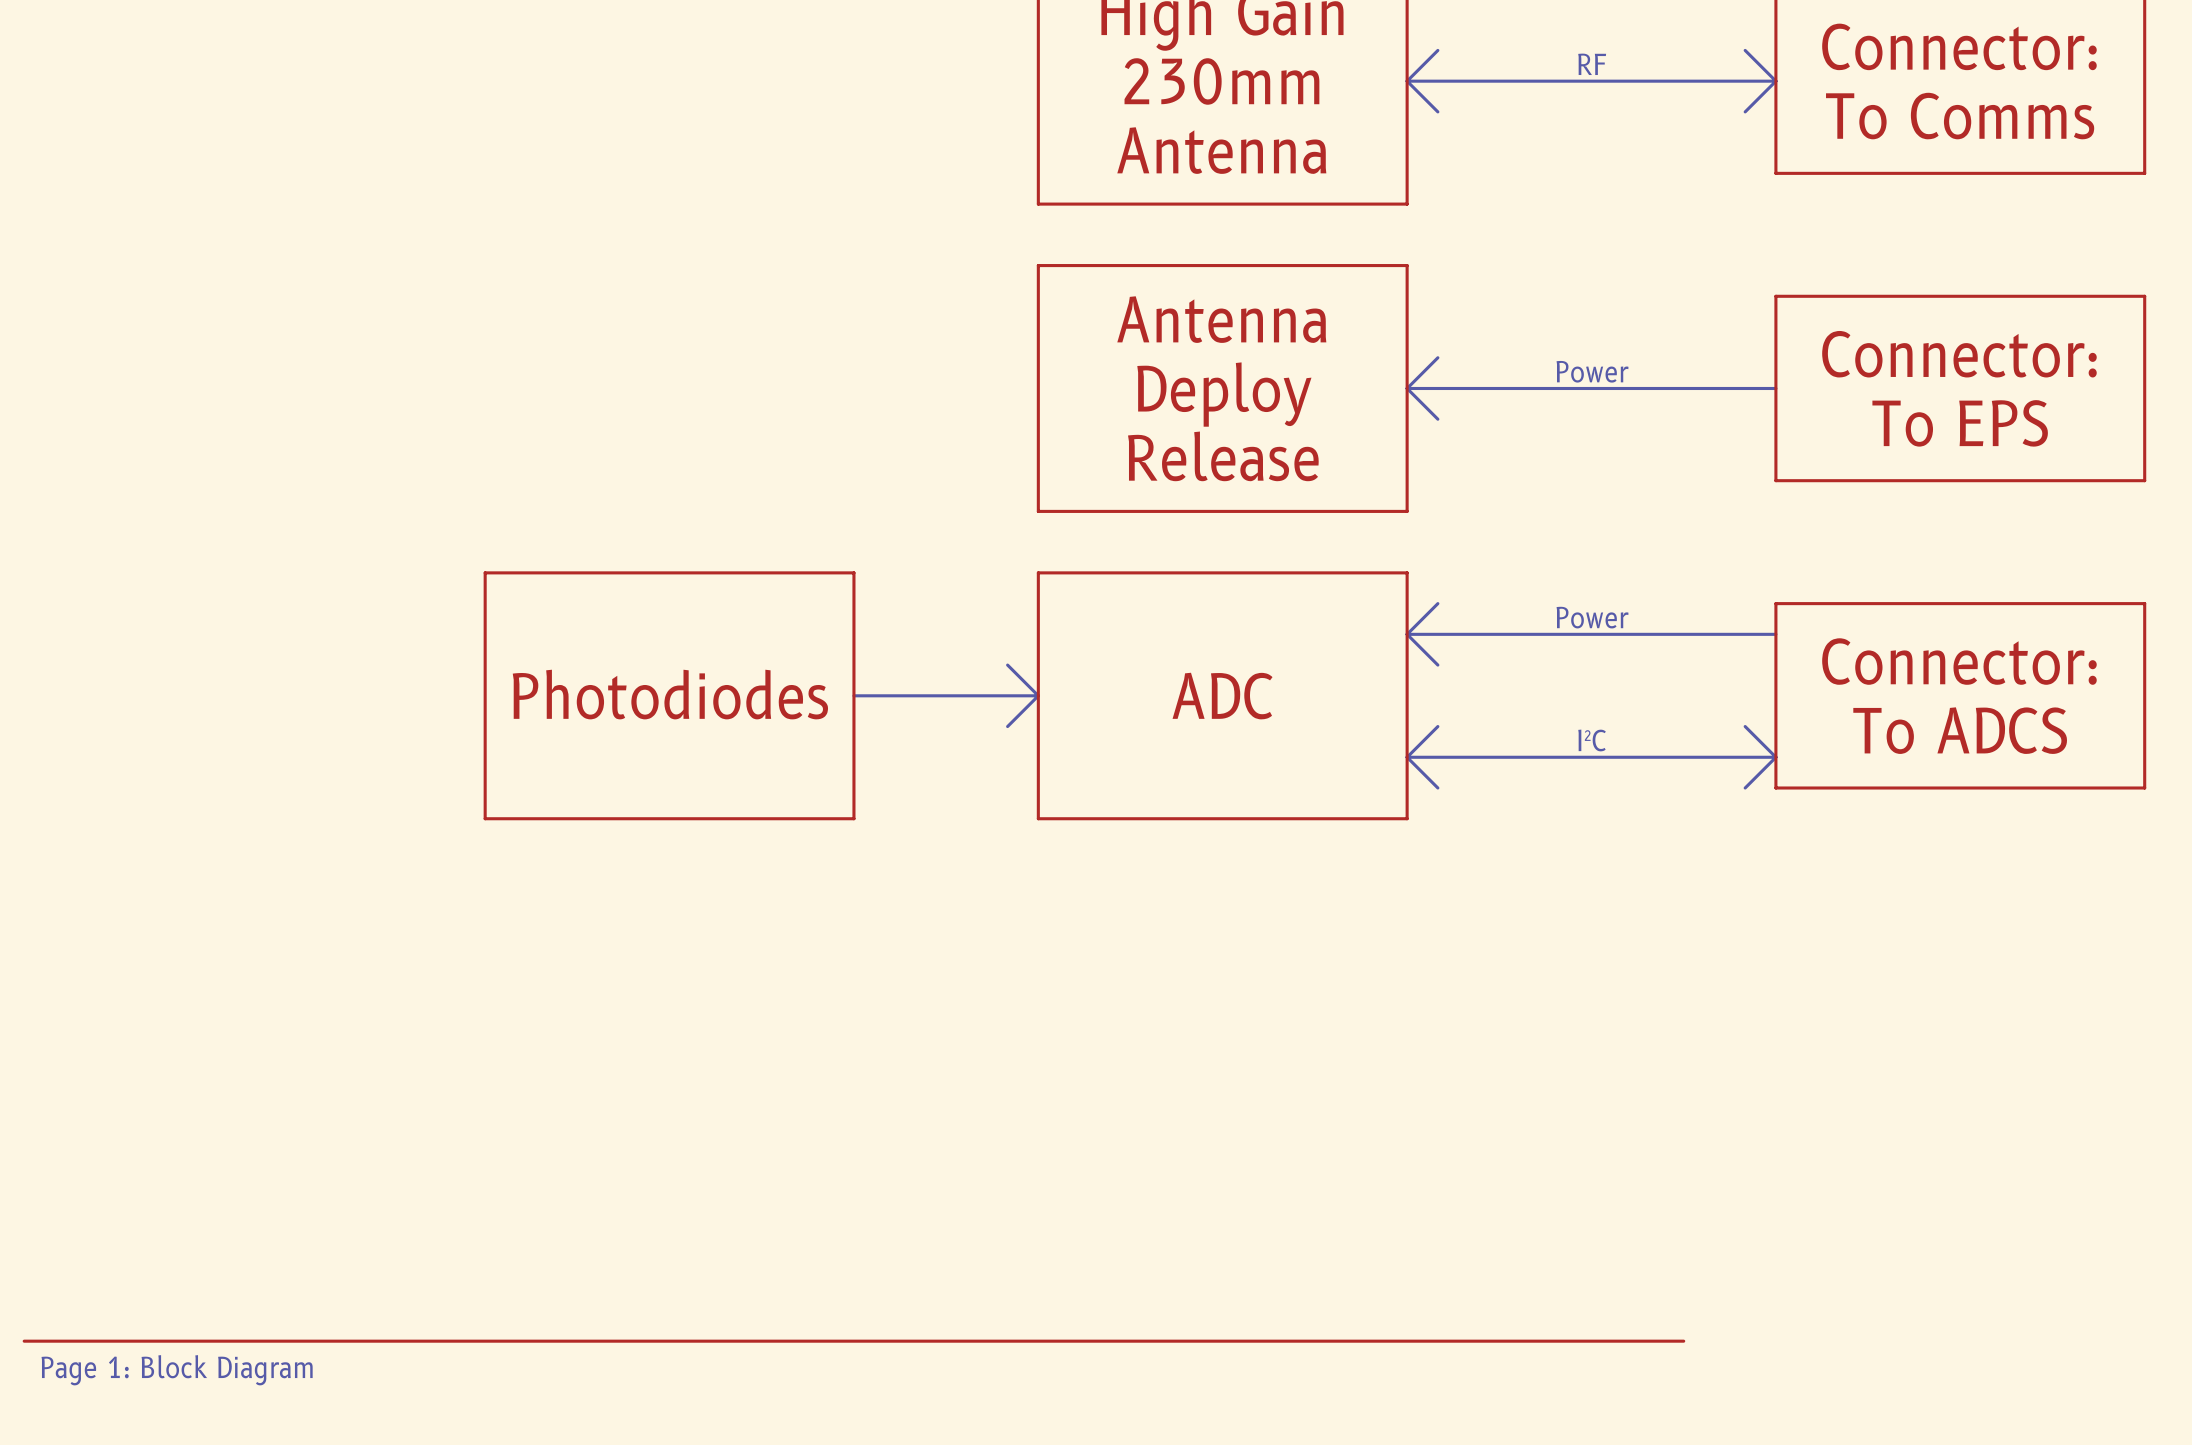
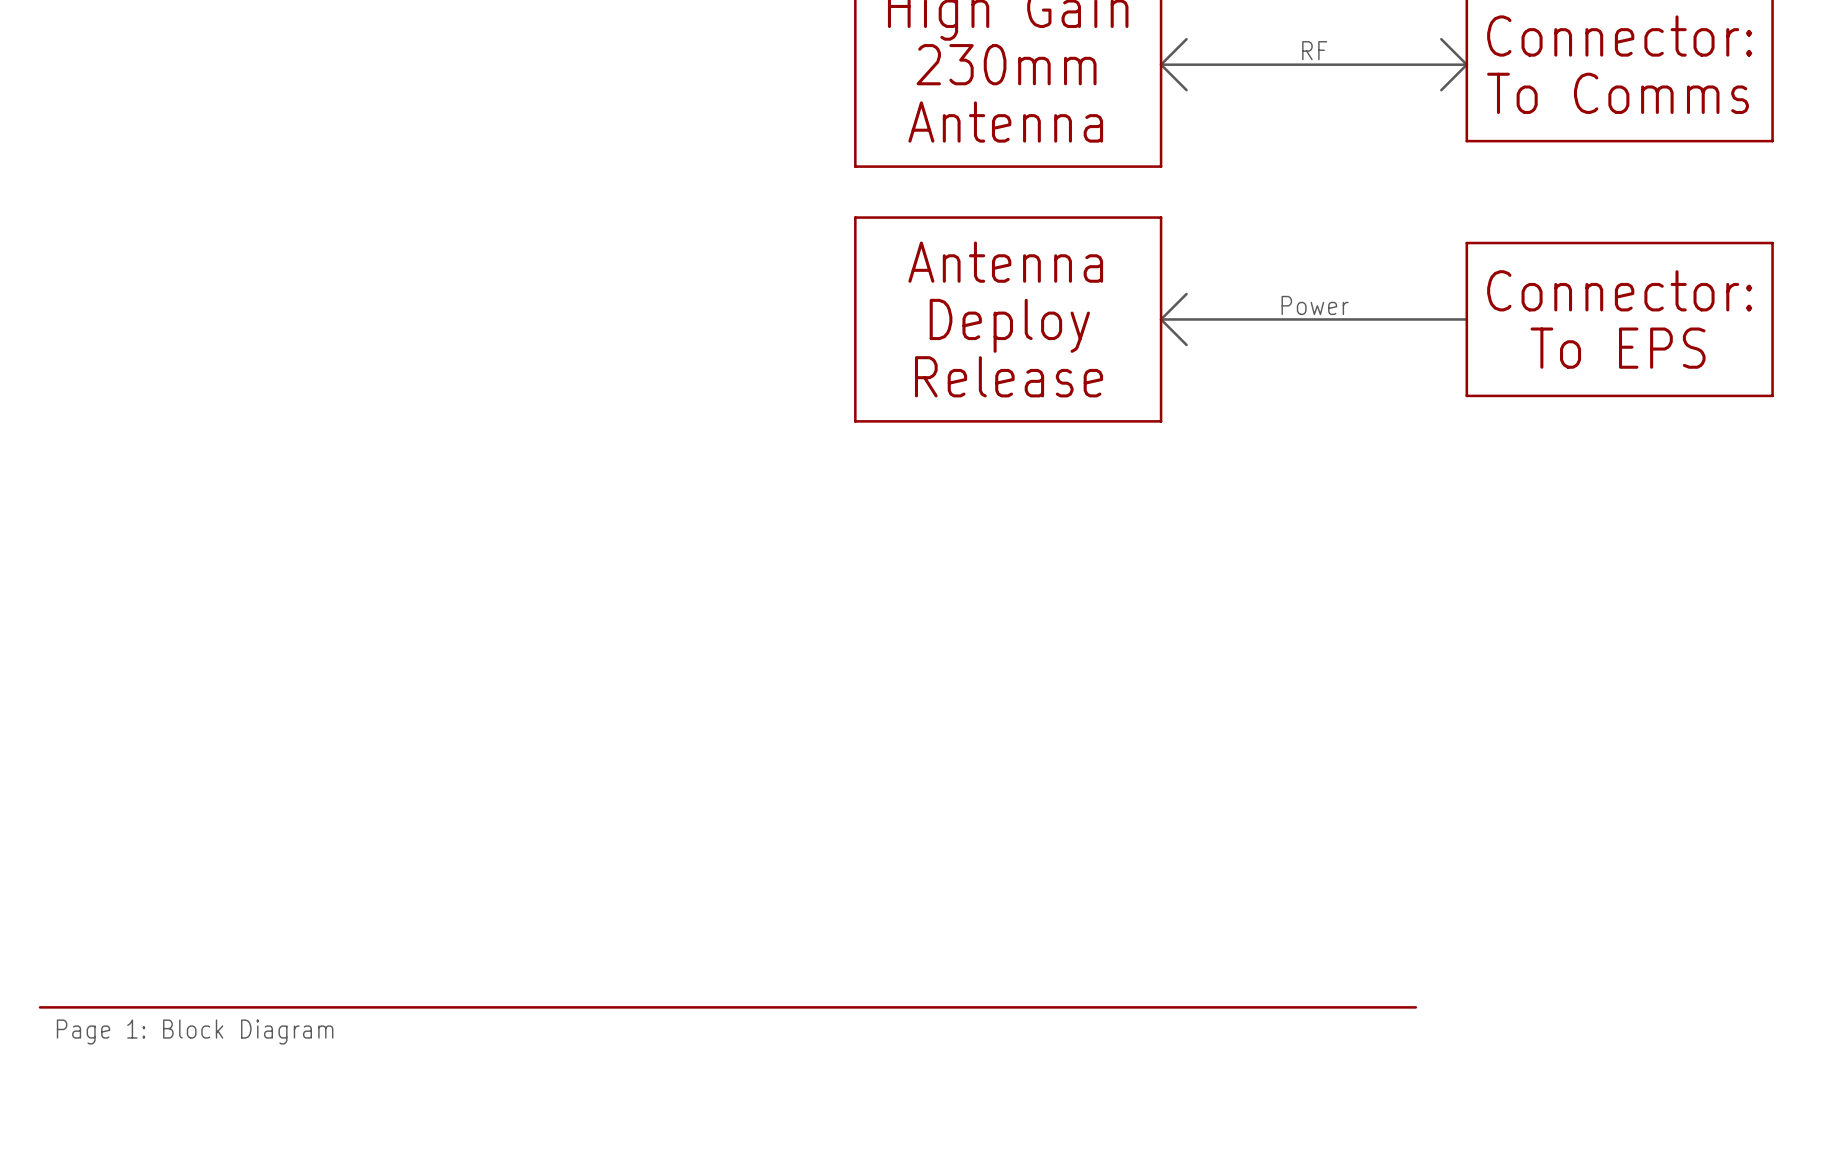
line: (485, 572) (853, 572) (853, 818) (485, 818) (485, 572) -> none
line: (1038, 572) (1407, 572) (1407, 818) (1038, 818) (1038, 572) -> none
line: (1437, 603) (1407, 634) -> none
line: (1775, 603) (1775, 788) (2144, 788) (2144, 603) (1775, 603) -> none
text: Power (1592, 617) -> none
line: (1407, 634) (1775, 634) -> none
line: (1407, 634) (1437, 665) -> none
text: Connector: (1959, 661) -> none
line: (1007, 665) (1038, 695) -> none
text: Photodiodes (670, 694) -> none
line: (853, 695) (1038, 695) -> none
line: (1038, 695) (1007, 726) -> none
text: ADC (1222, 696) -> none
line: (1437, 726) (1407, 757) -> none
line: (1745, 726) (1775, 757) -> none
text: To ADCS (1960, 730) -> none
text: I²C (1592, 740) -> none
line: (1407, 757) (1775, 757) -> none
line: (1407, 757) (1437, 788) -> none
line: (1775, 757) (1745, 788) -> none
line: (24, 1341) (1683, 1341) -> (40, 1007) (1415, 1007)
text position: Page 1: Block Diagram (177, 1370) -> Page 1: Block Diagram (195, 1032)

